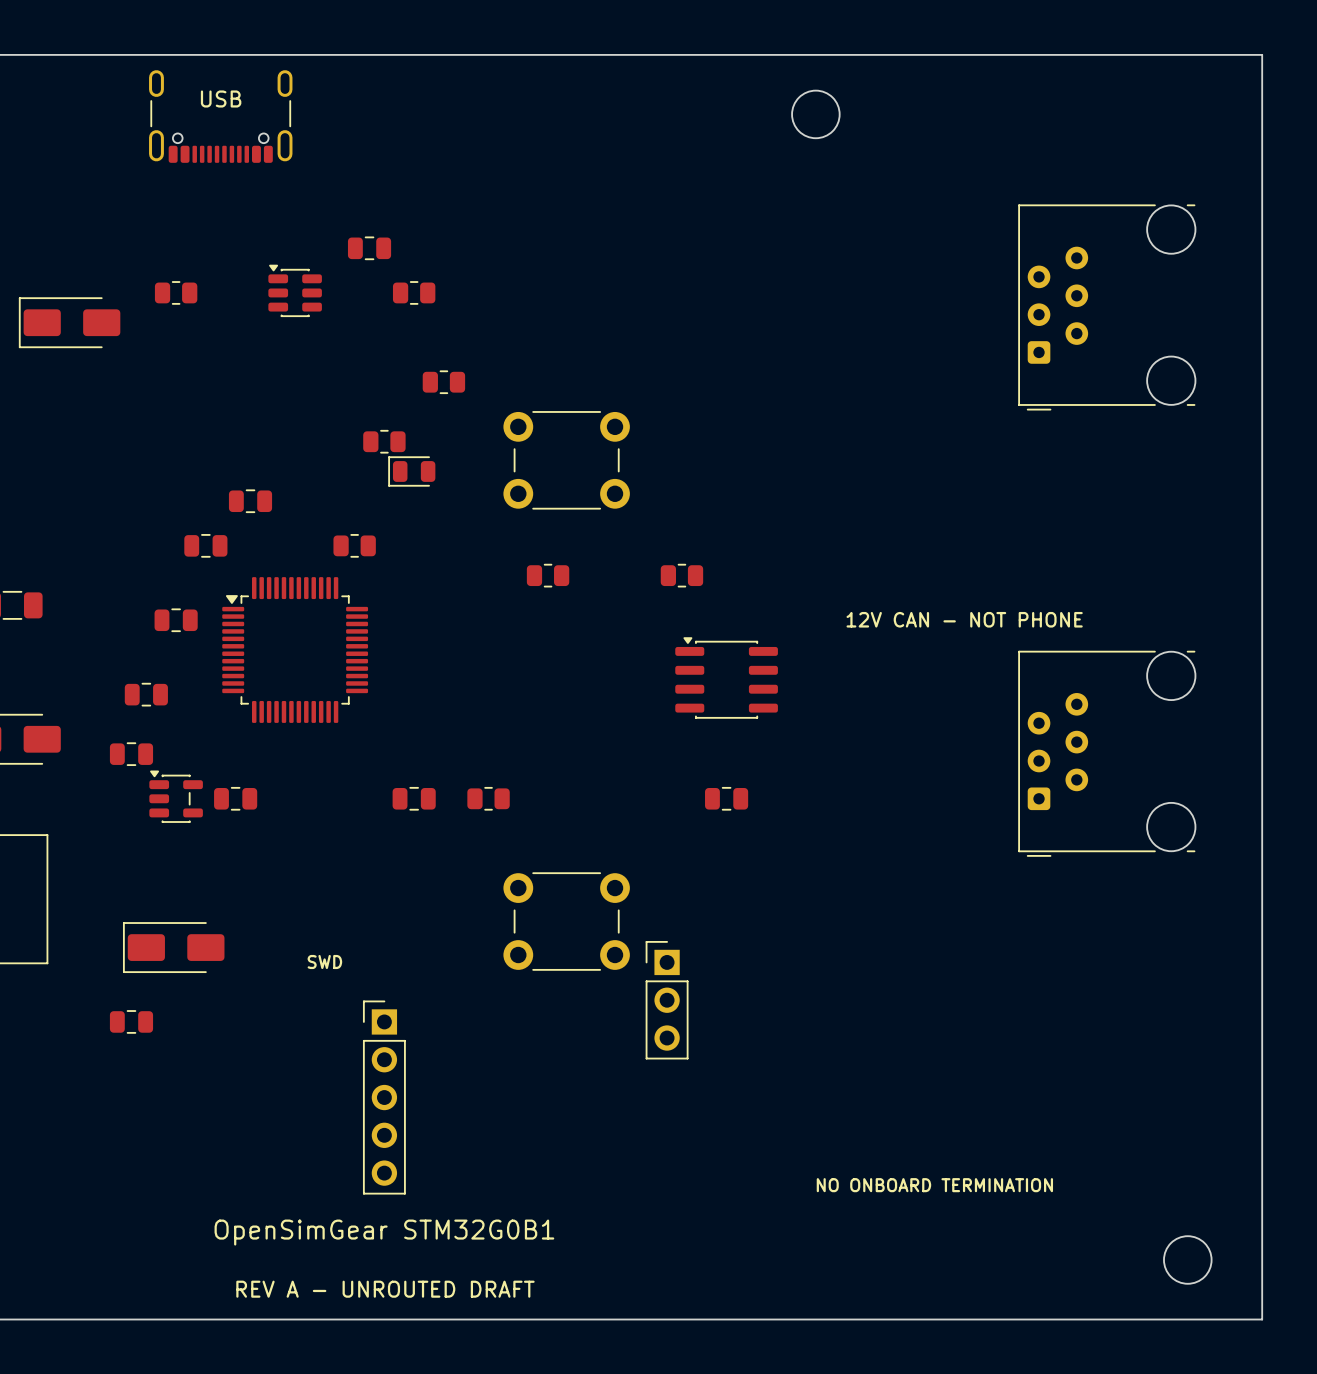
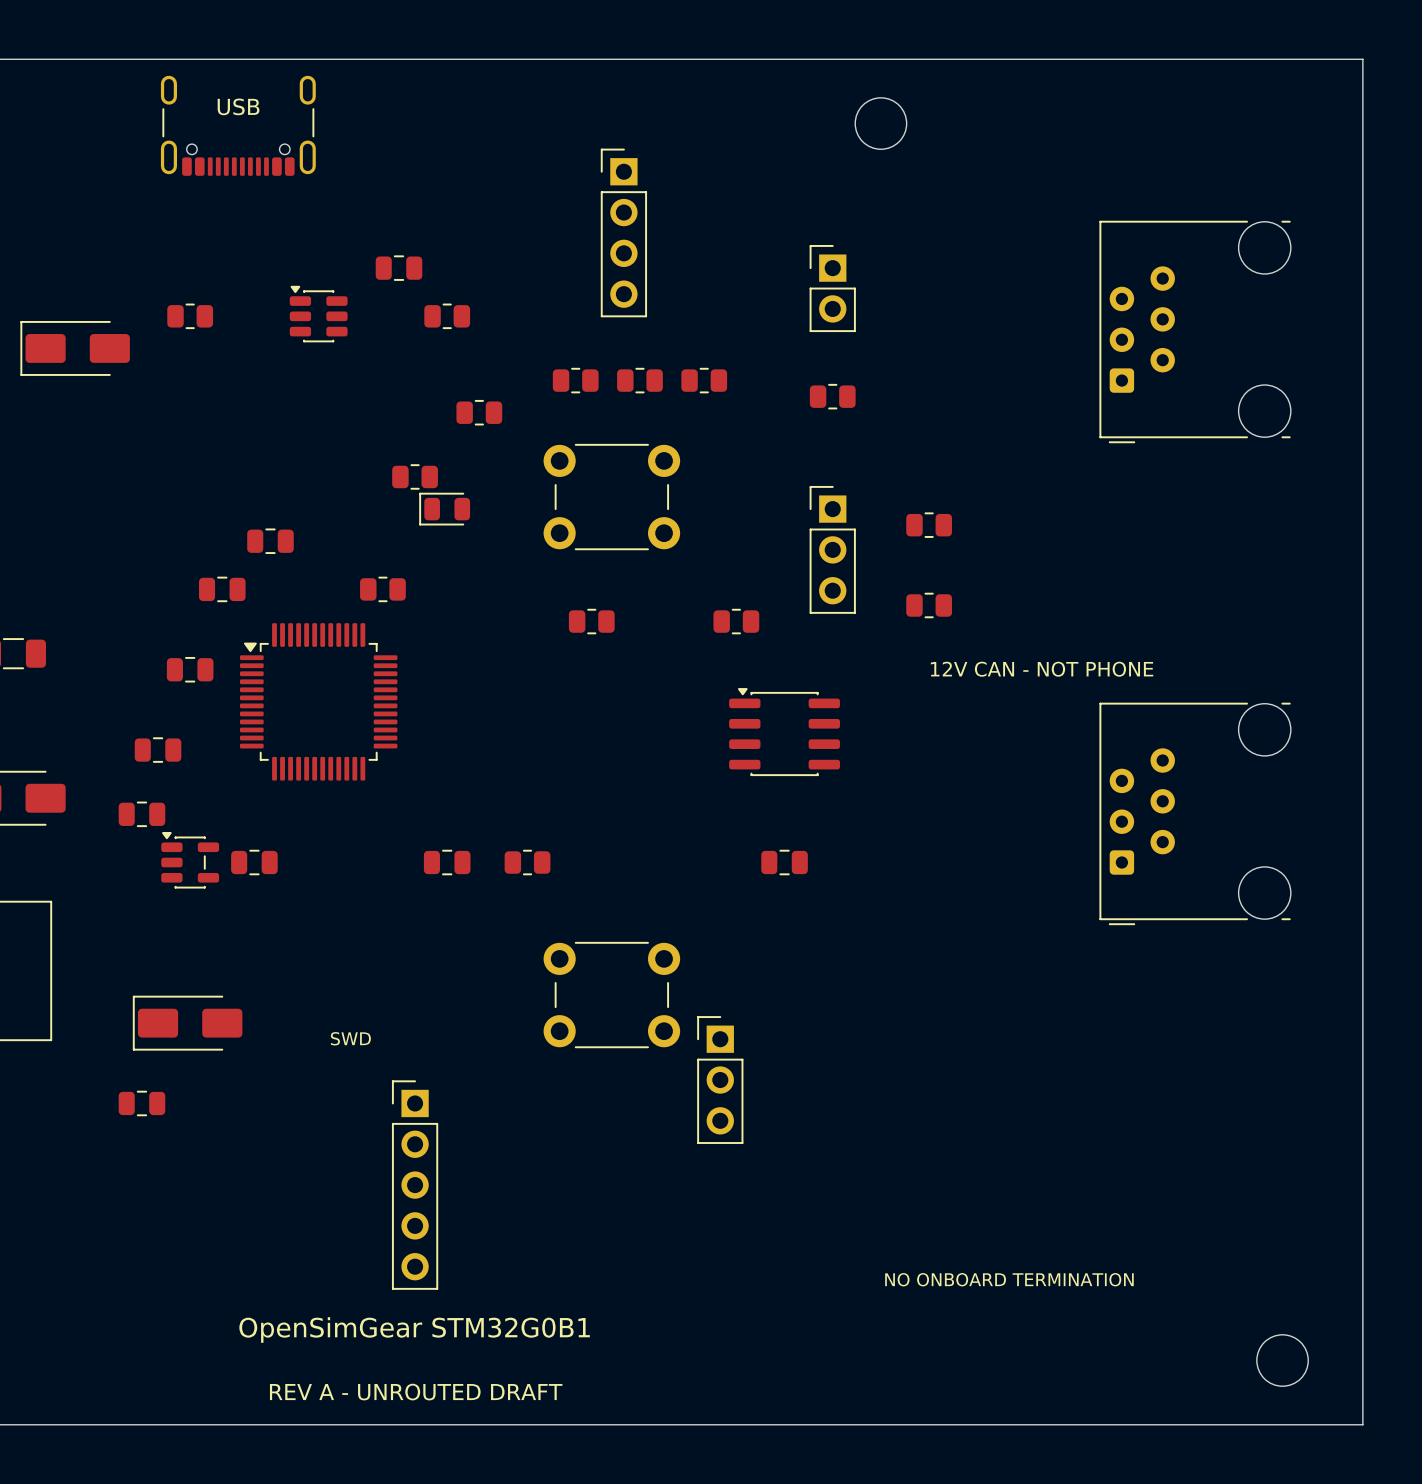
part: none -> (623, 232)
part: none -> (832, 288)
part: none -> (575, 380)
part: none -> (639, 380)
part: none -> (704, 380)
part: none -> (832, 396)
part: none -> (929, 525)
part: none -> (832, 549)
part: none -> (929, 605)

